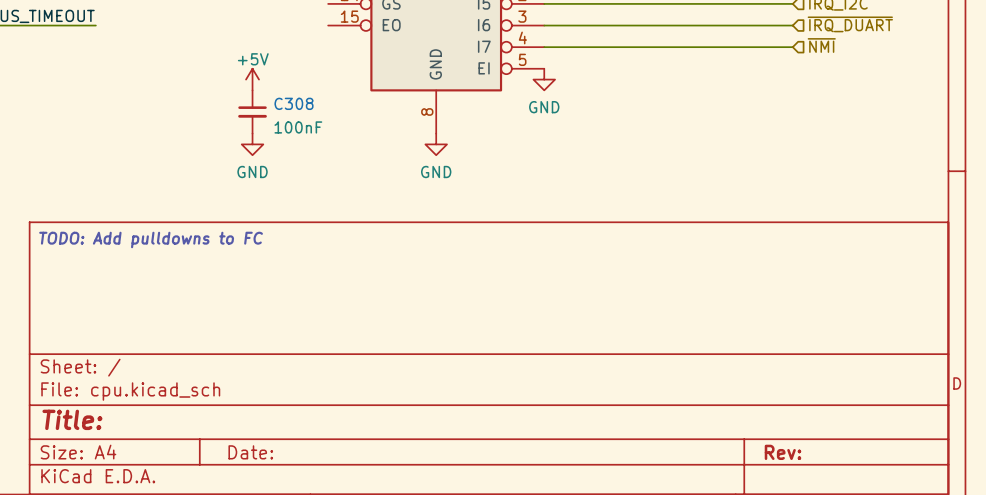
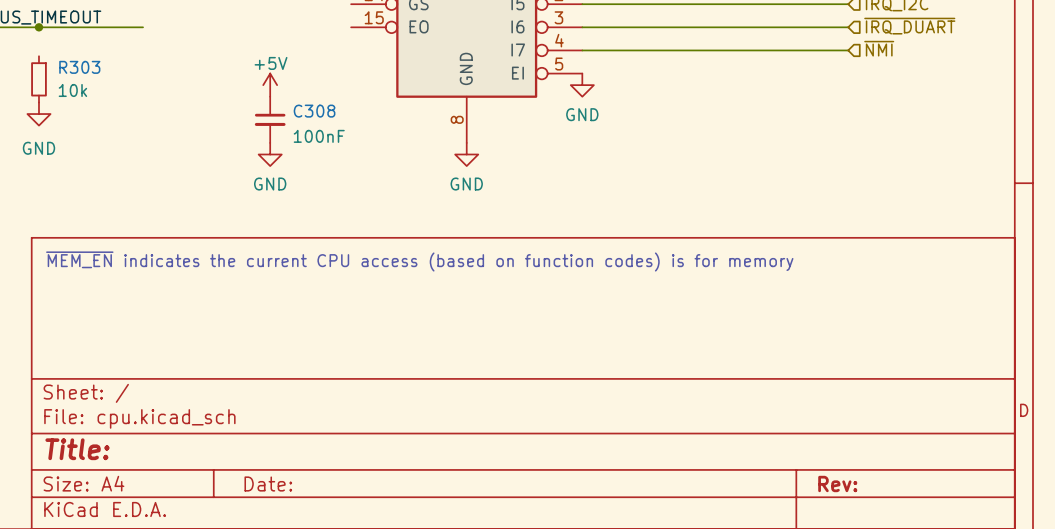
junction: none -> (38, 27)
wire: none -> (102, 27) (143, 27)
R303: none -> 10k (38, 79)
power symbol: none -> GND (38, 114)
text: TODO: Add pulldowns to FC (151, 239) -> ~{MEM_EN} indicates the current CPU access (based on function codes) is for memory (419, 261)

